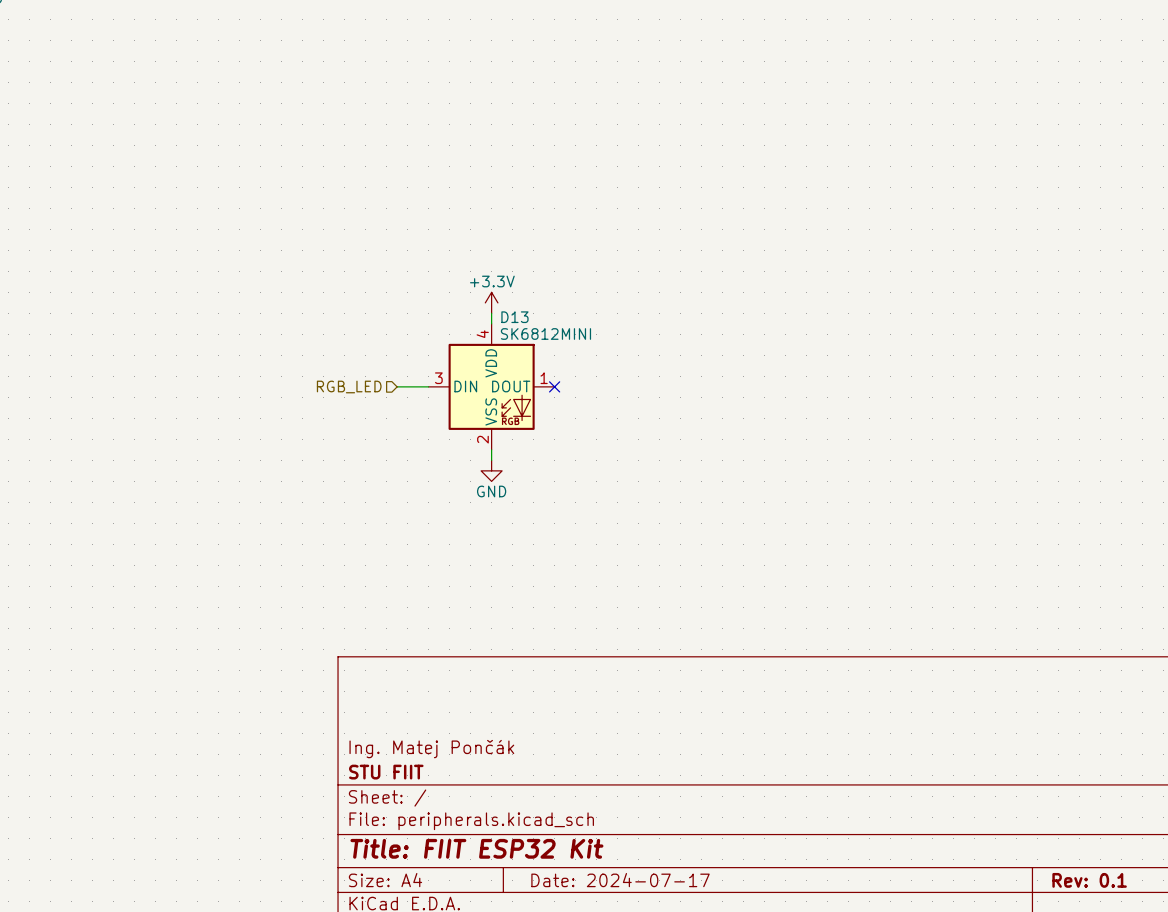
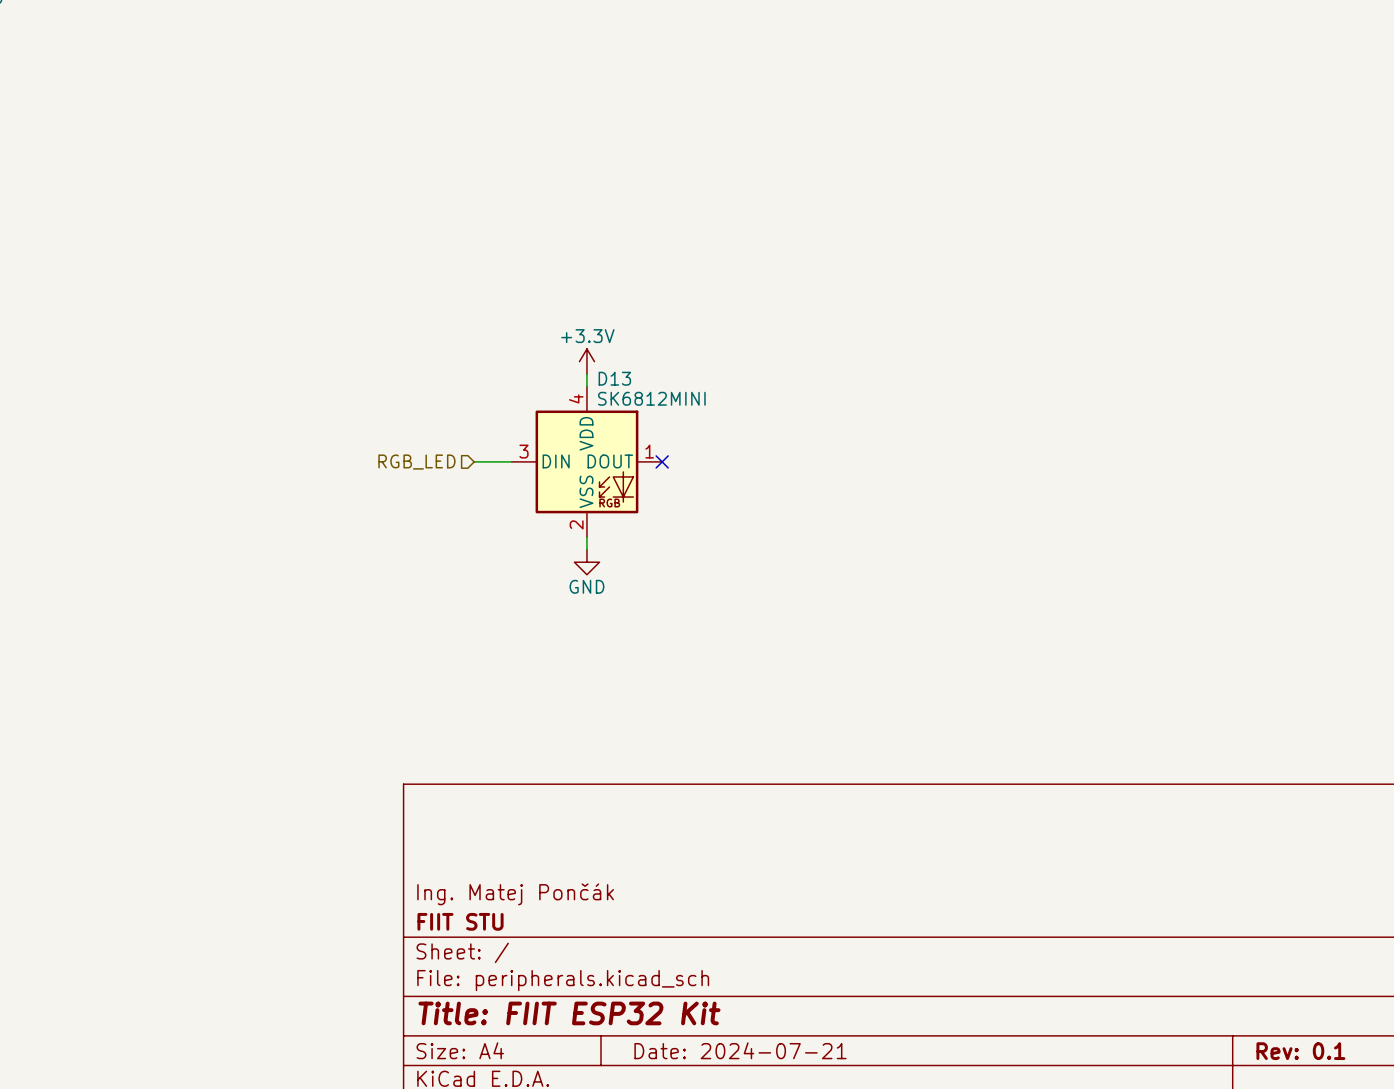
title block: STU FIIT (386, 772) -> FIIT STU (460, 921)
title block: Date: 2024-07-17 (620, 880) -> Date: 2024-07-21 (740, 1050)

